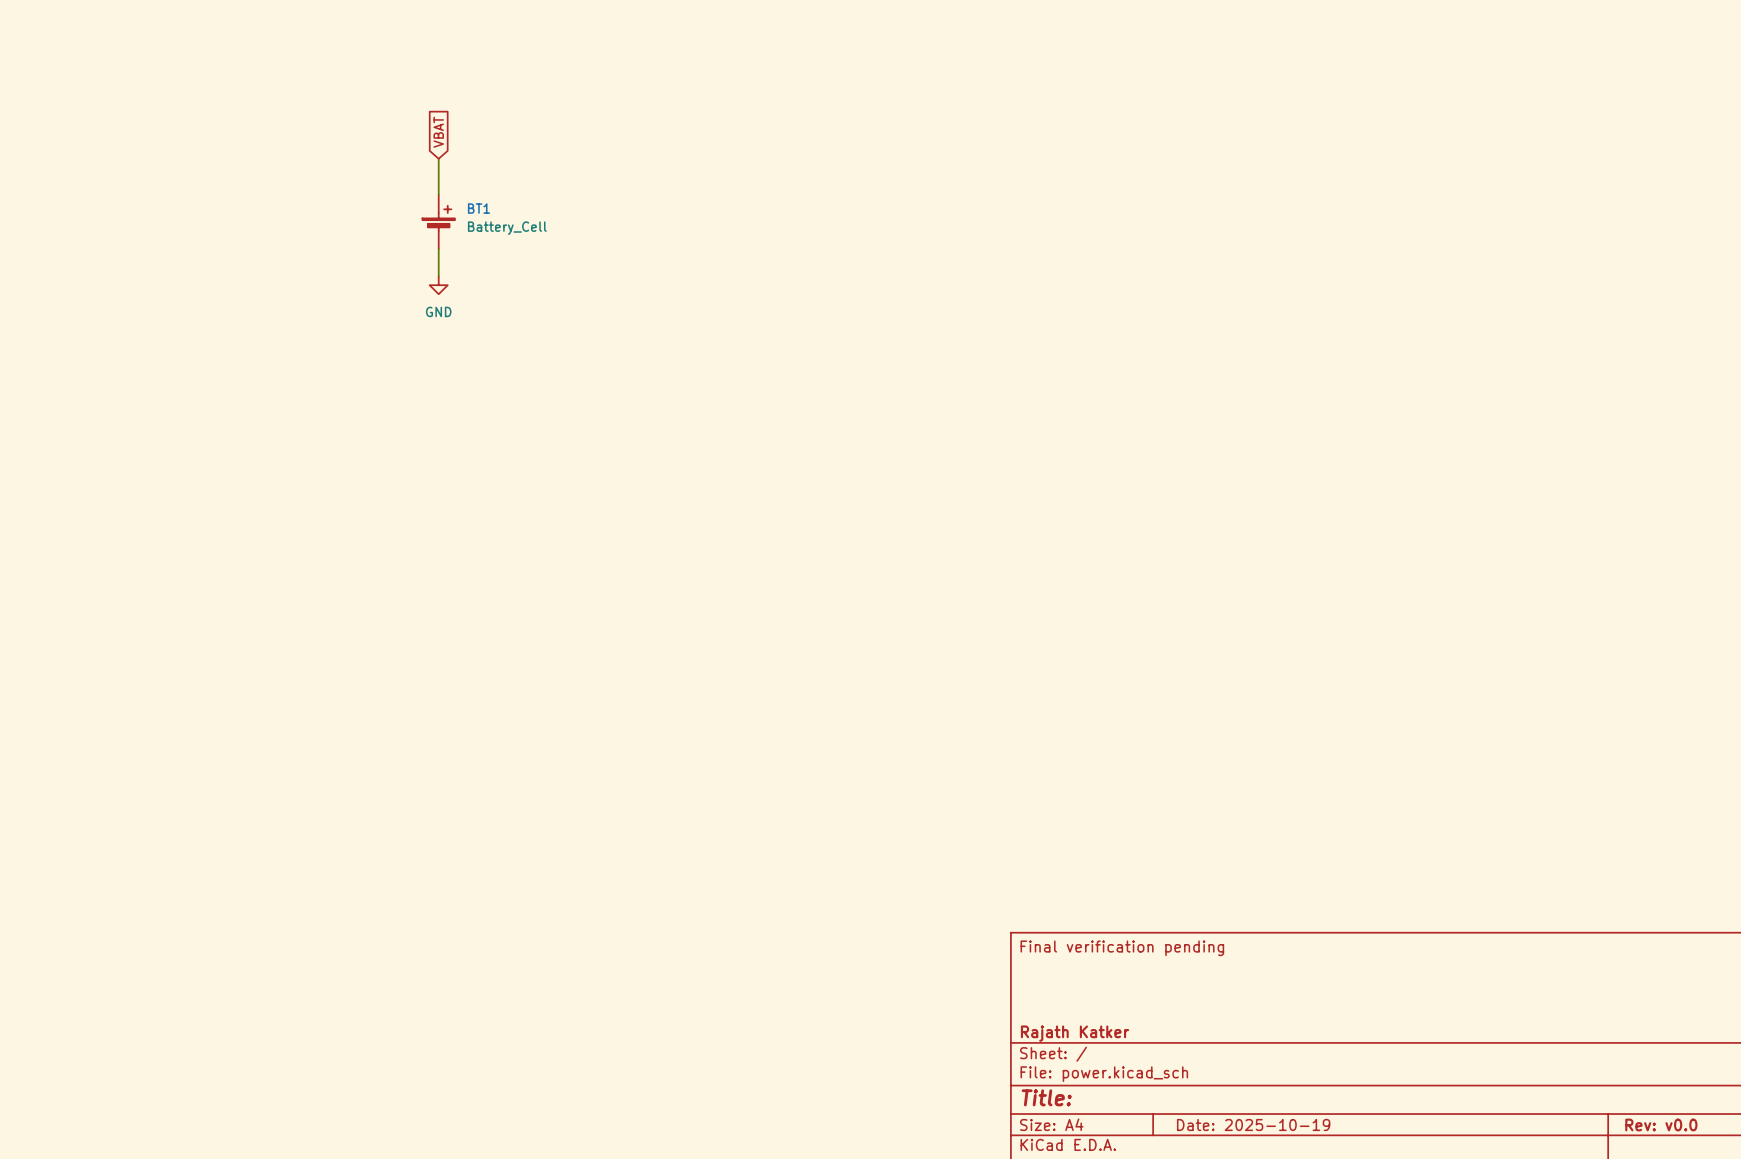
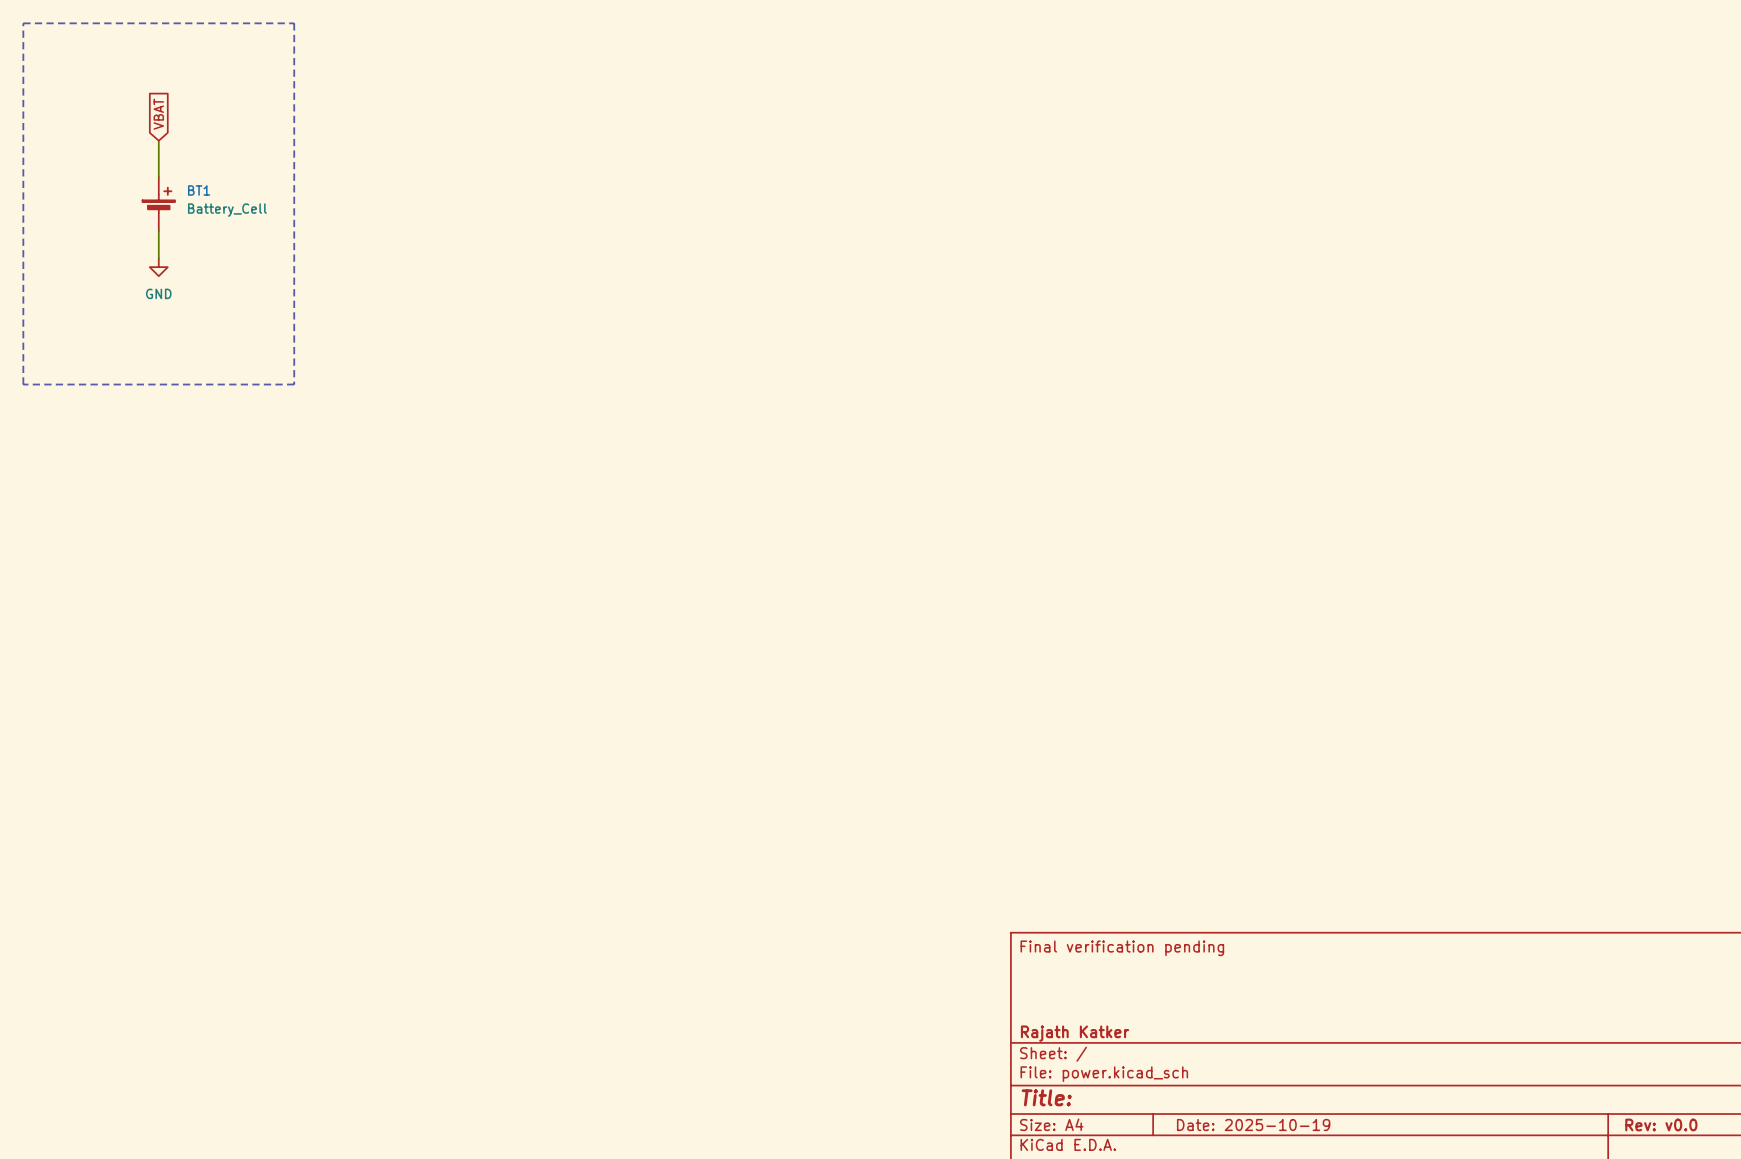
line: none -> (23, 23) (294, 23) (294, 384) (23, 384) (23, 23)
global label: none -> VBAT (158, 114)
global label: VBAT (438, 132) -> none
wire: none -> (158, 140) (158, 176)
wire: (438, 158) (438, 194) -> none
BT1 position: (438, 221) -> (158, 203)
wire: none -> (158, 231) (158, 258)
wire: (438, 249) (438, 276) -> none
power symbol: none -> GND (158, 267)
power symbol: GND (438, 285) -> none

